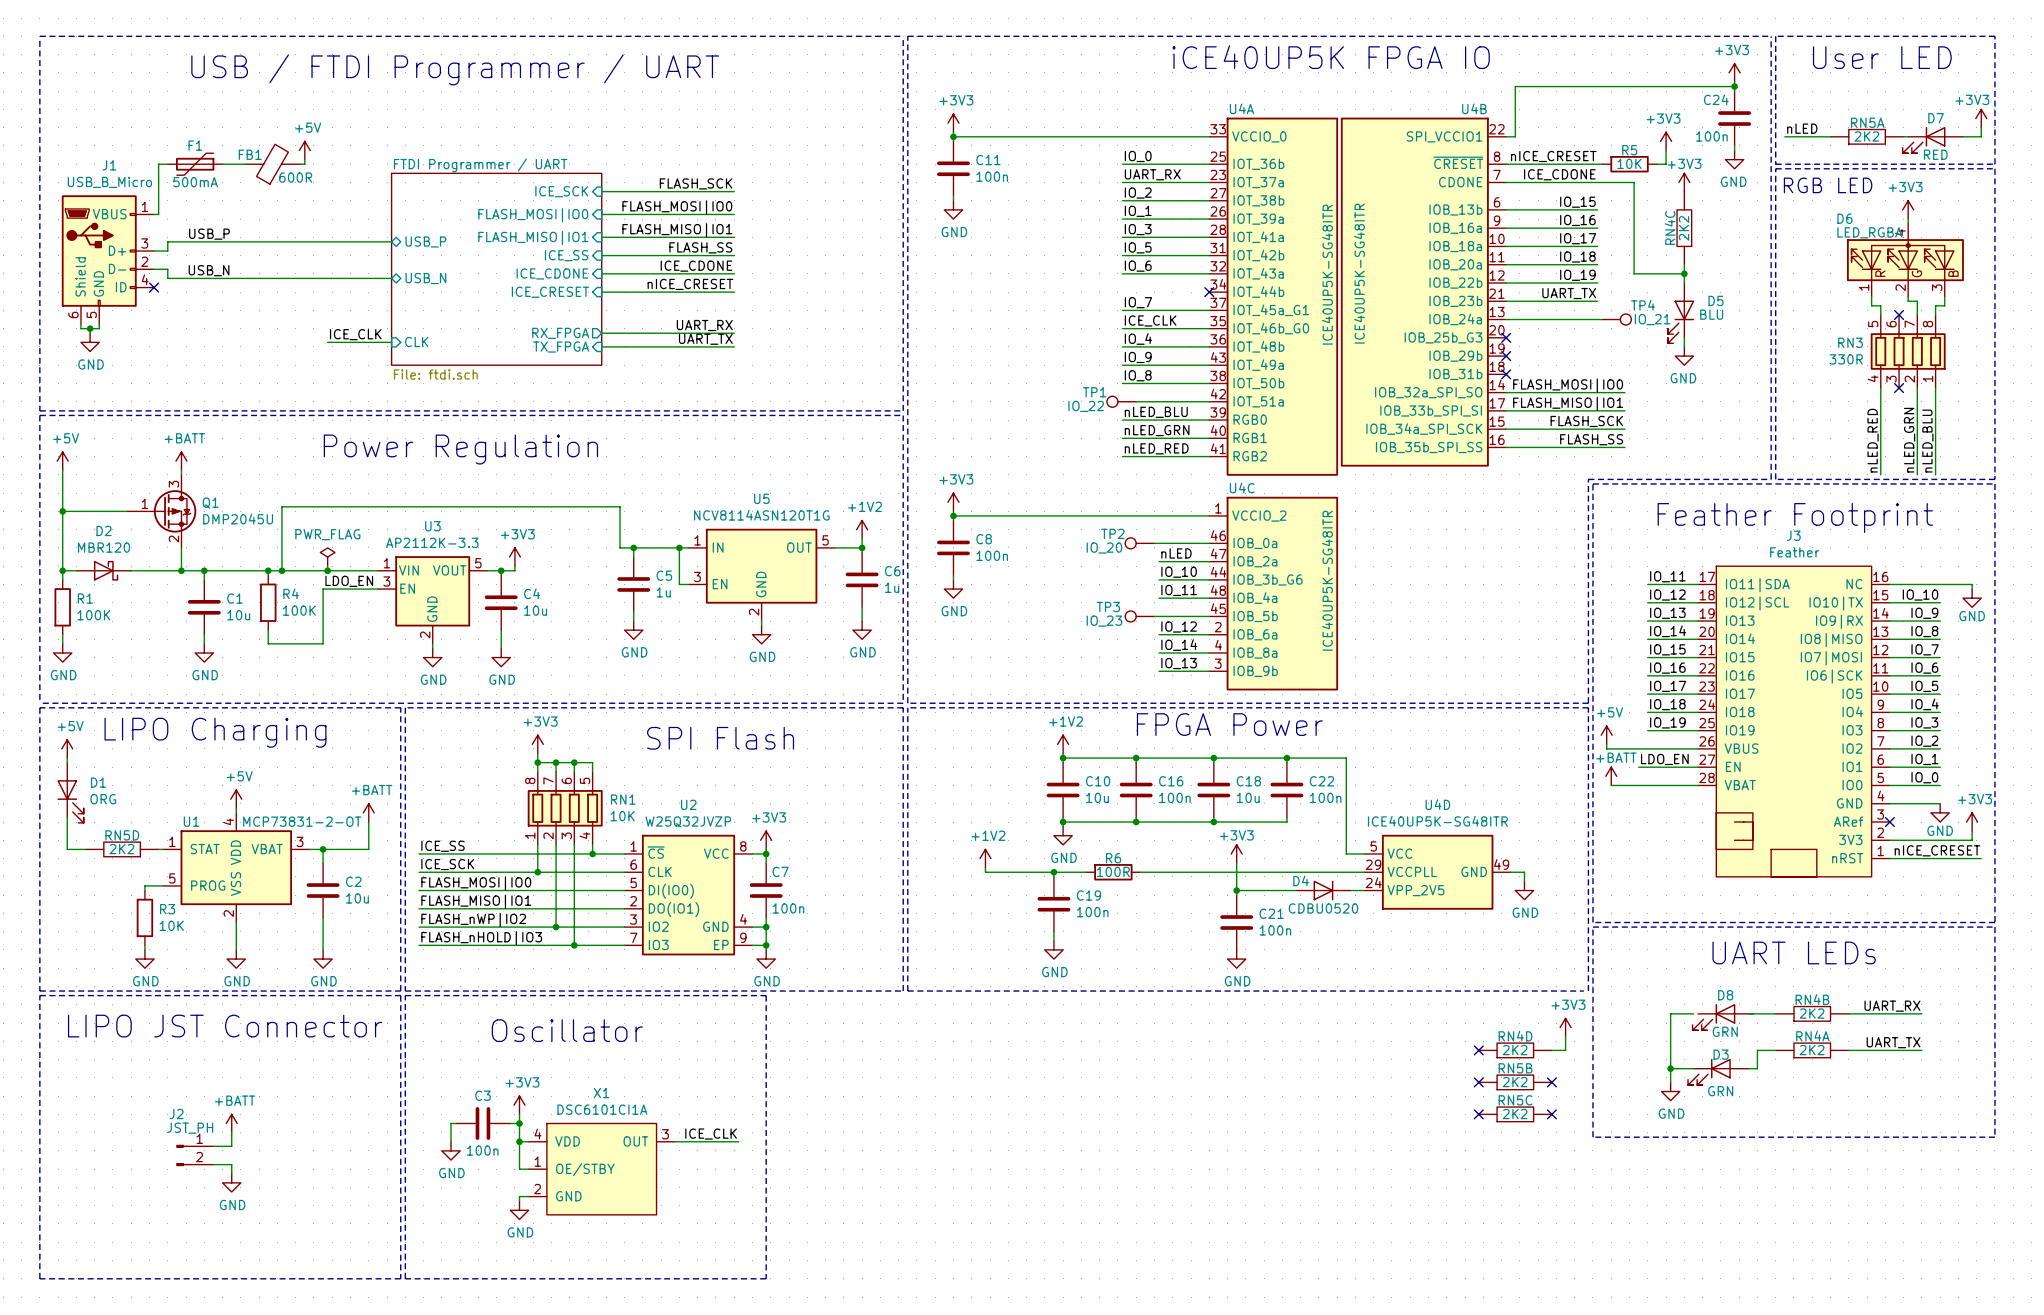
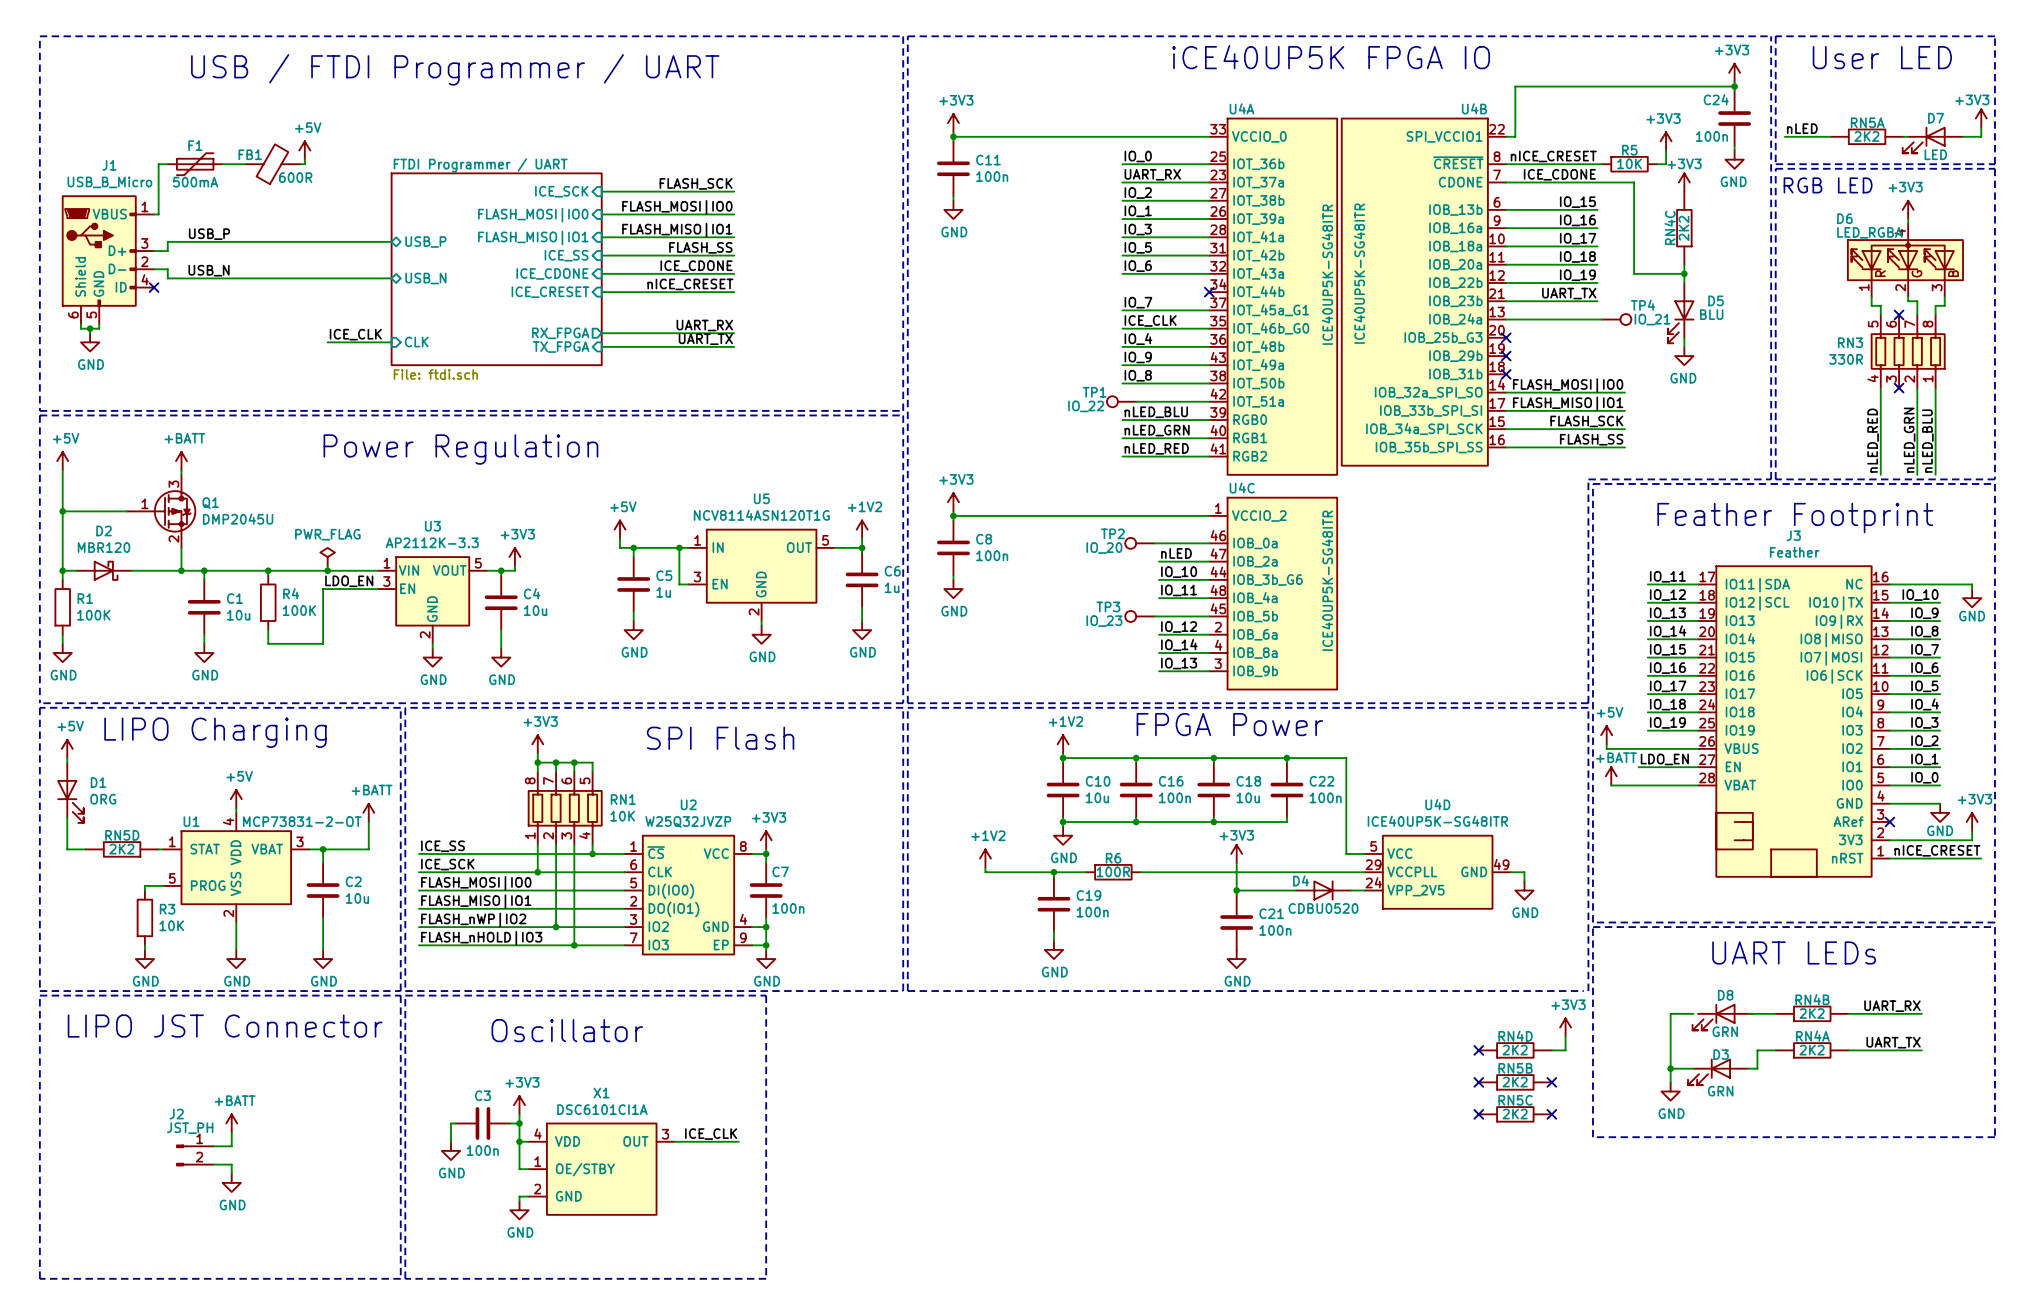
D7 value: RED (1935, 154) -> LED (1935, 154)
power symbol: none -> +5V (620, 529)
wire: (620, 538) (620, 506) (281, 506) (281, 570) -> none
junction: (281, 570) -> none

